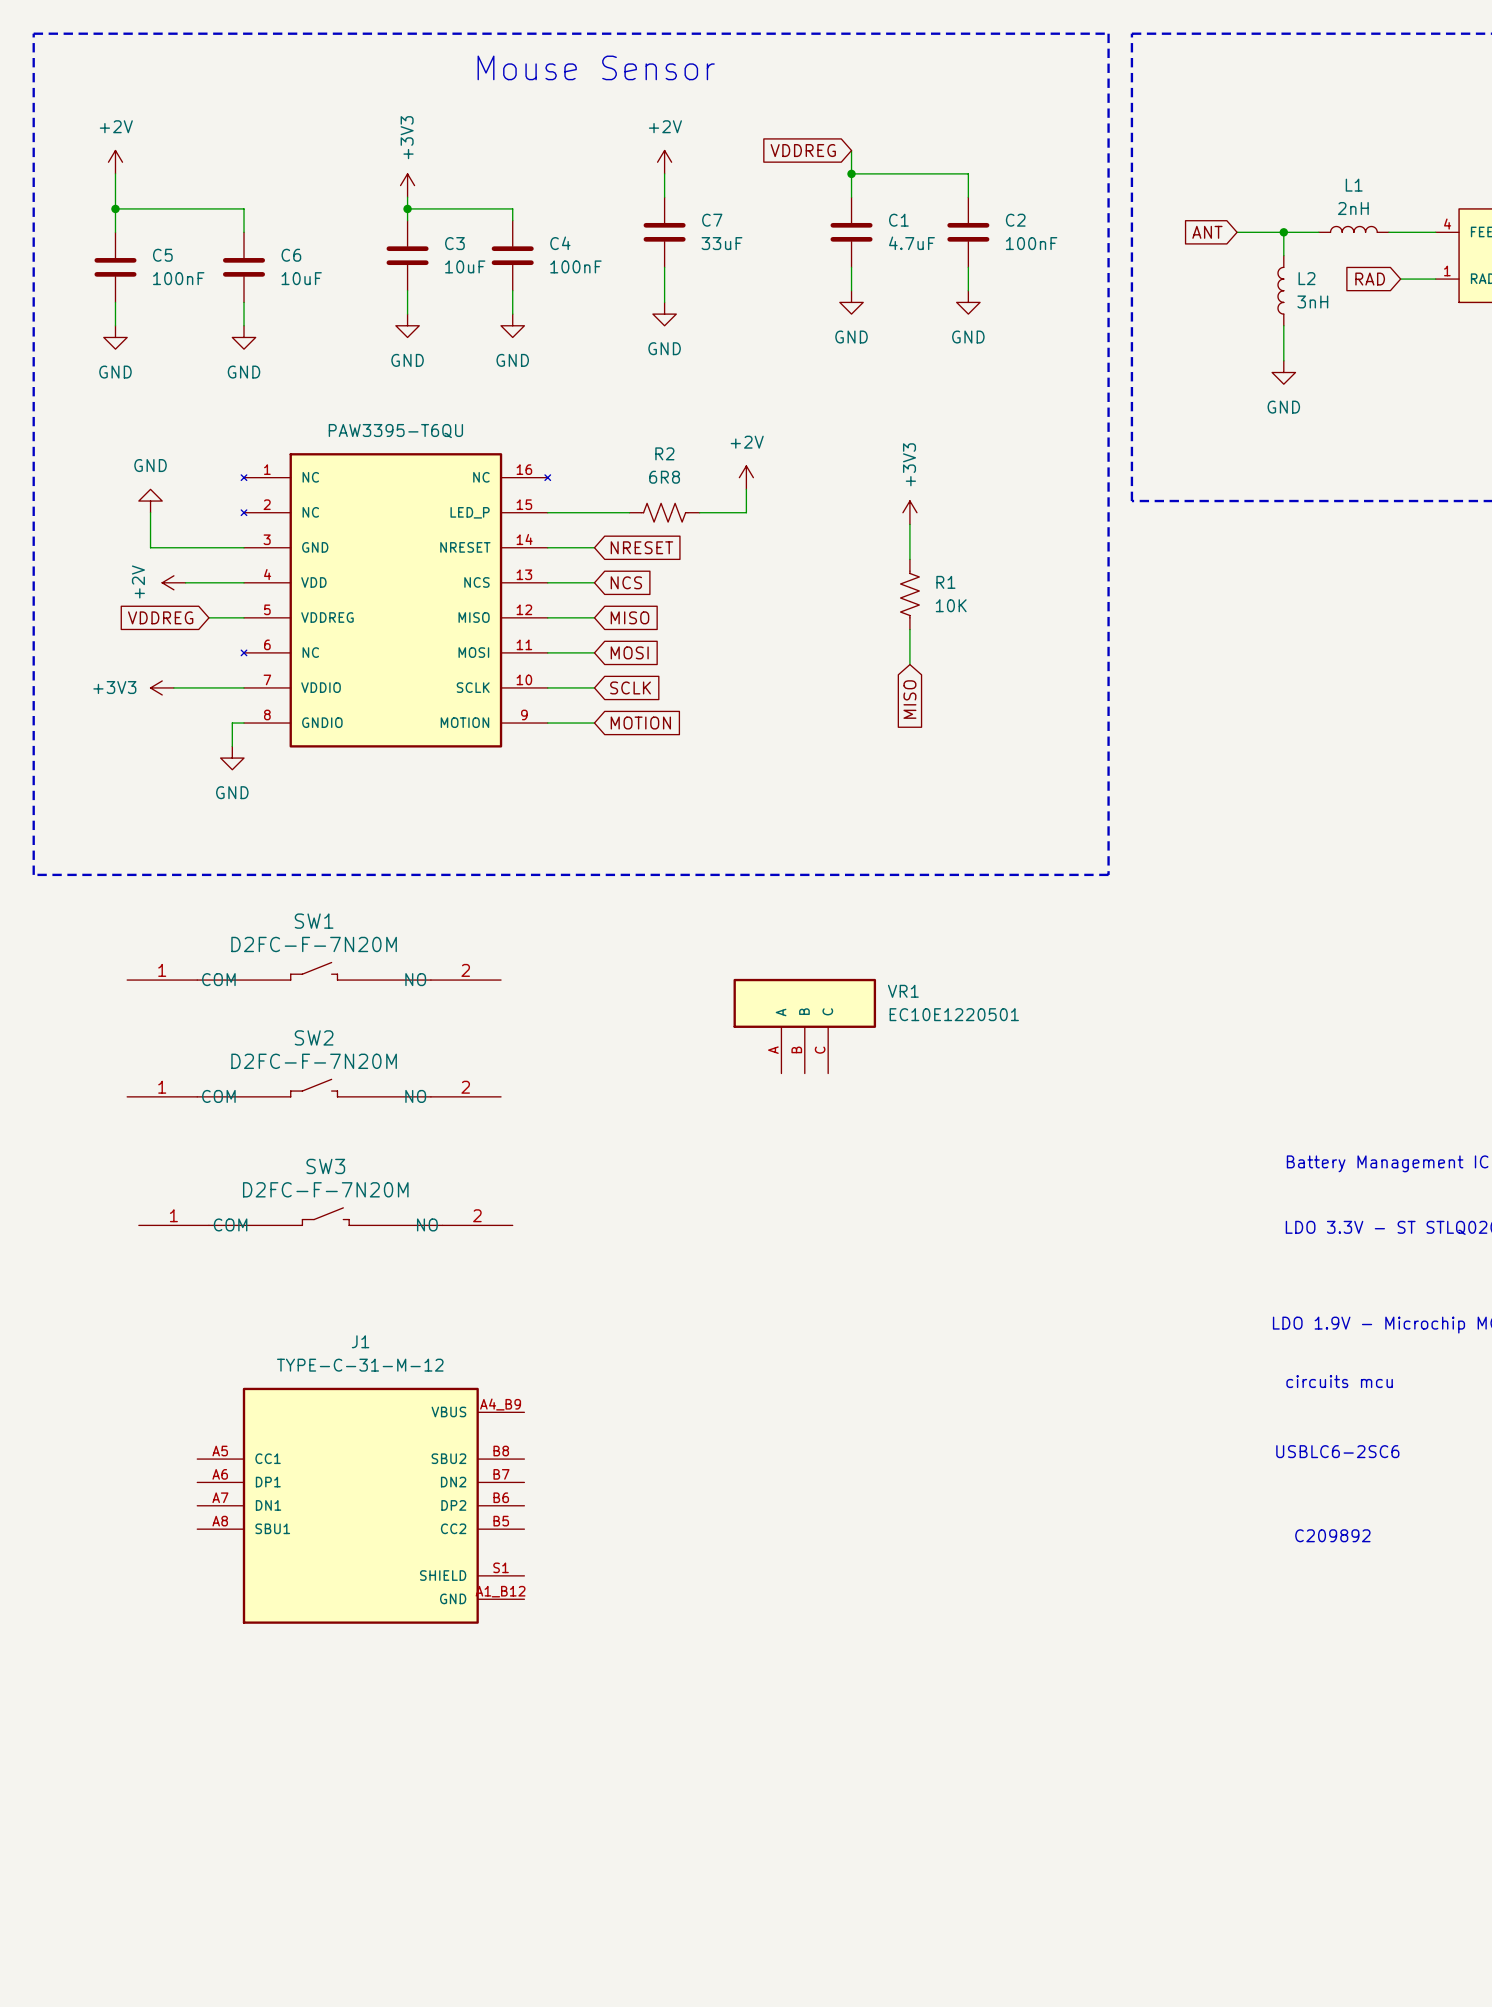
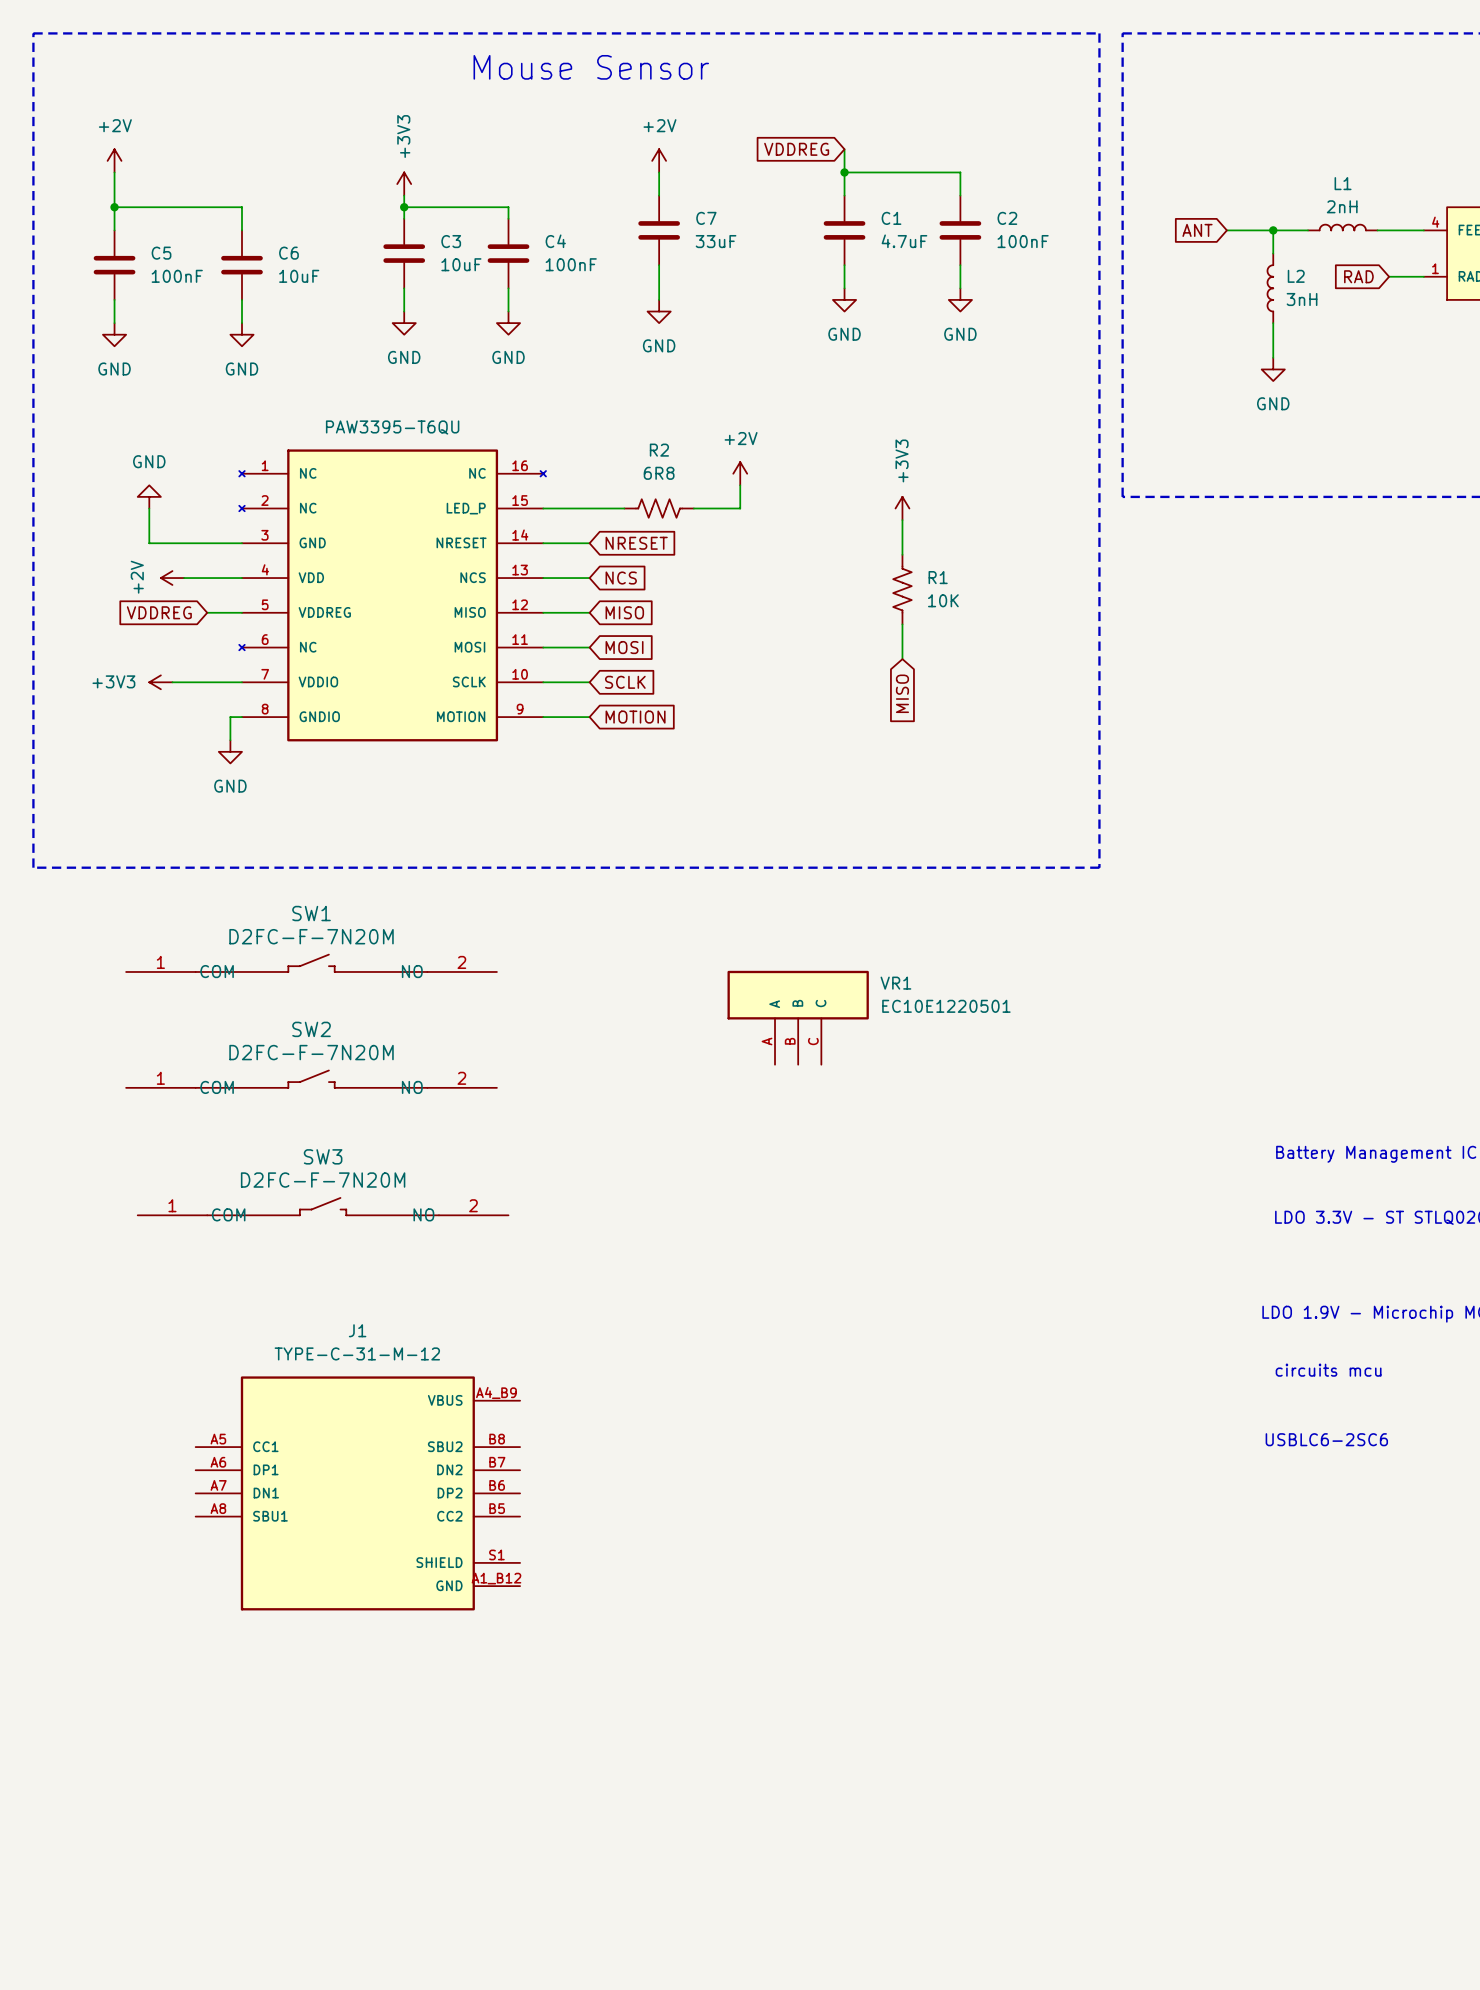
text: C209892 (1332, 1535) -> none

